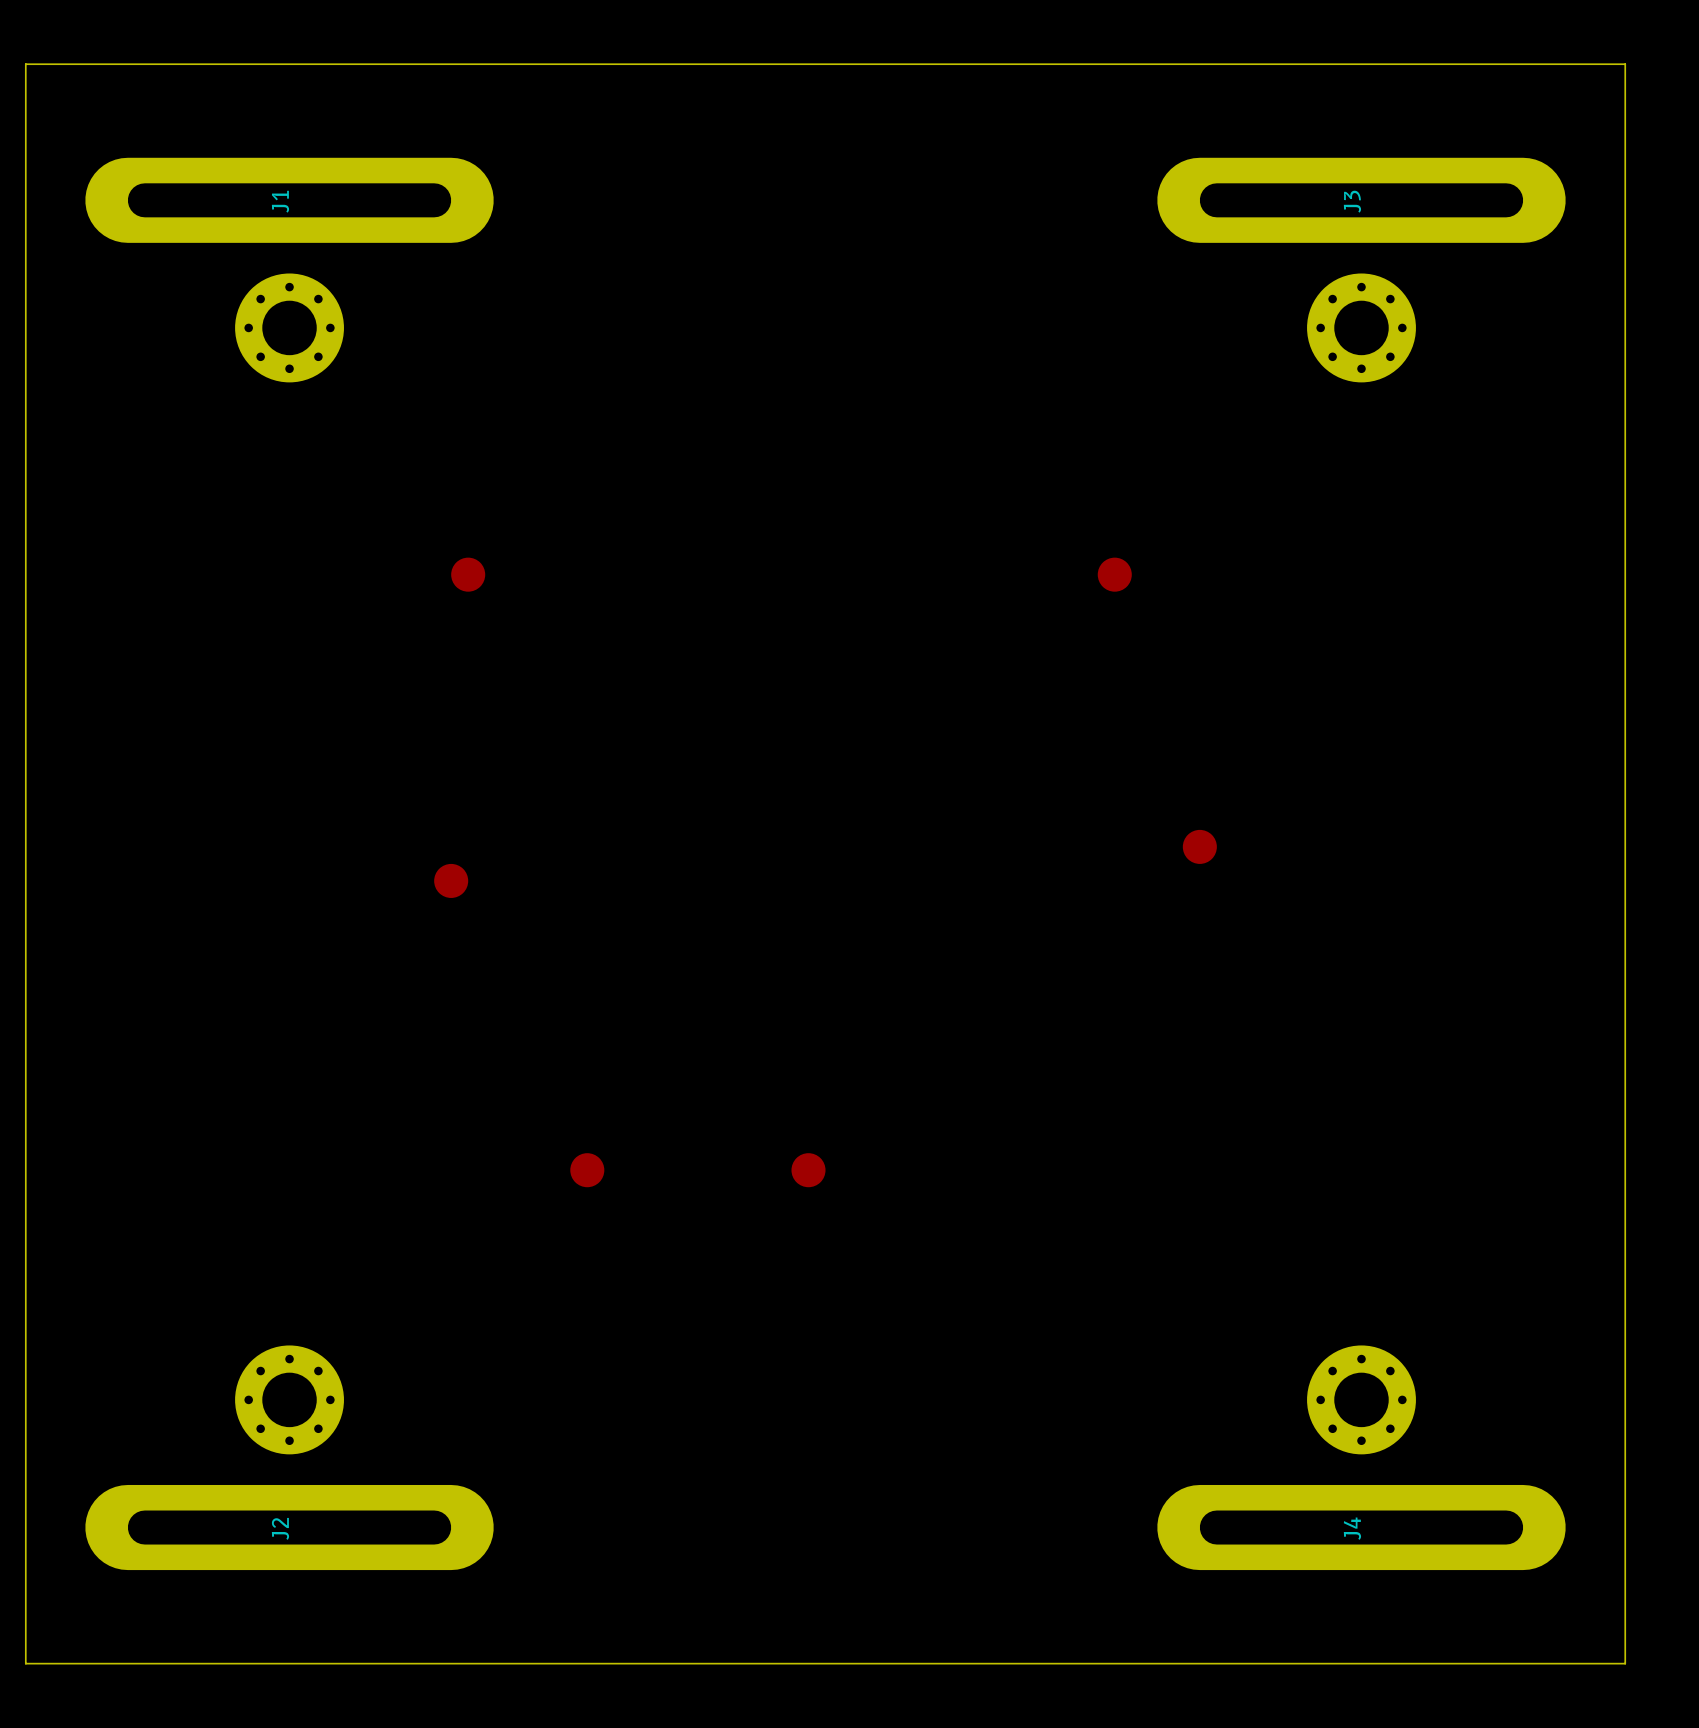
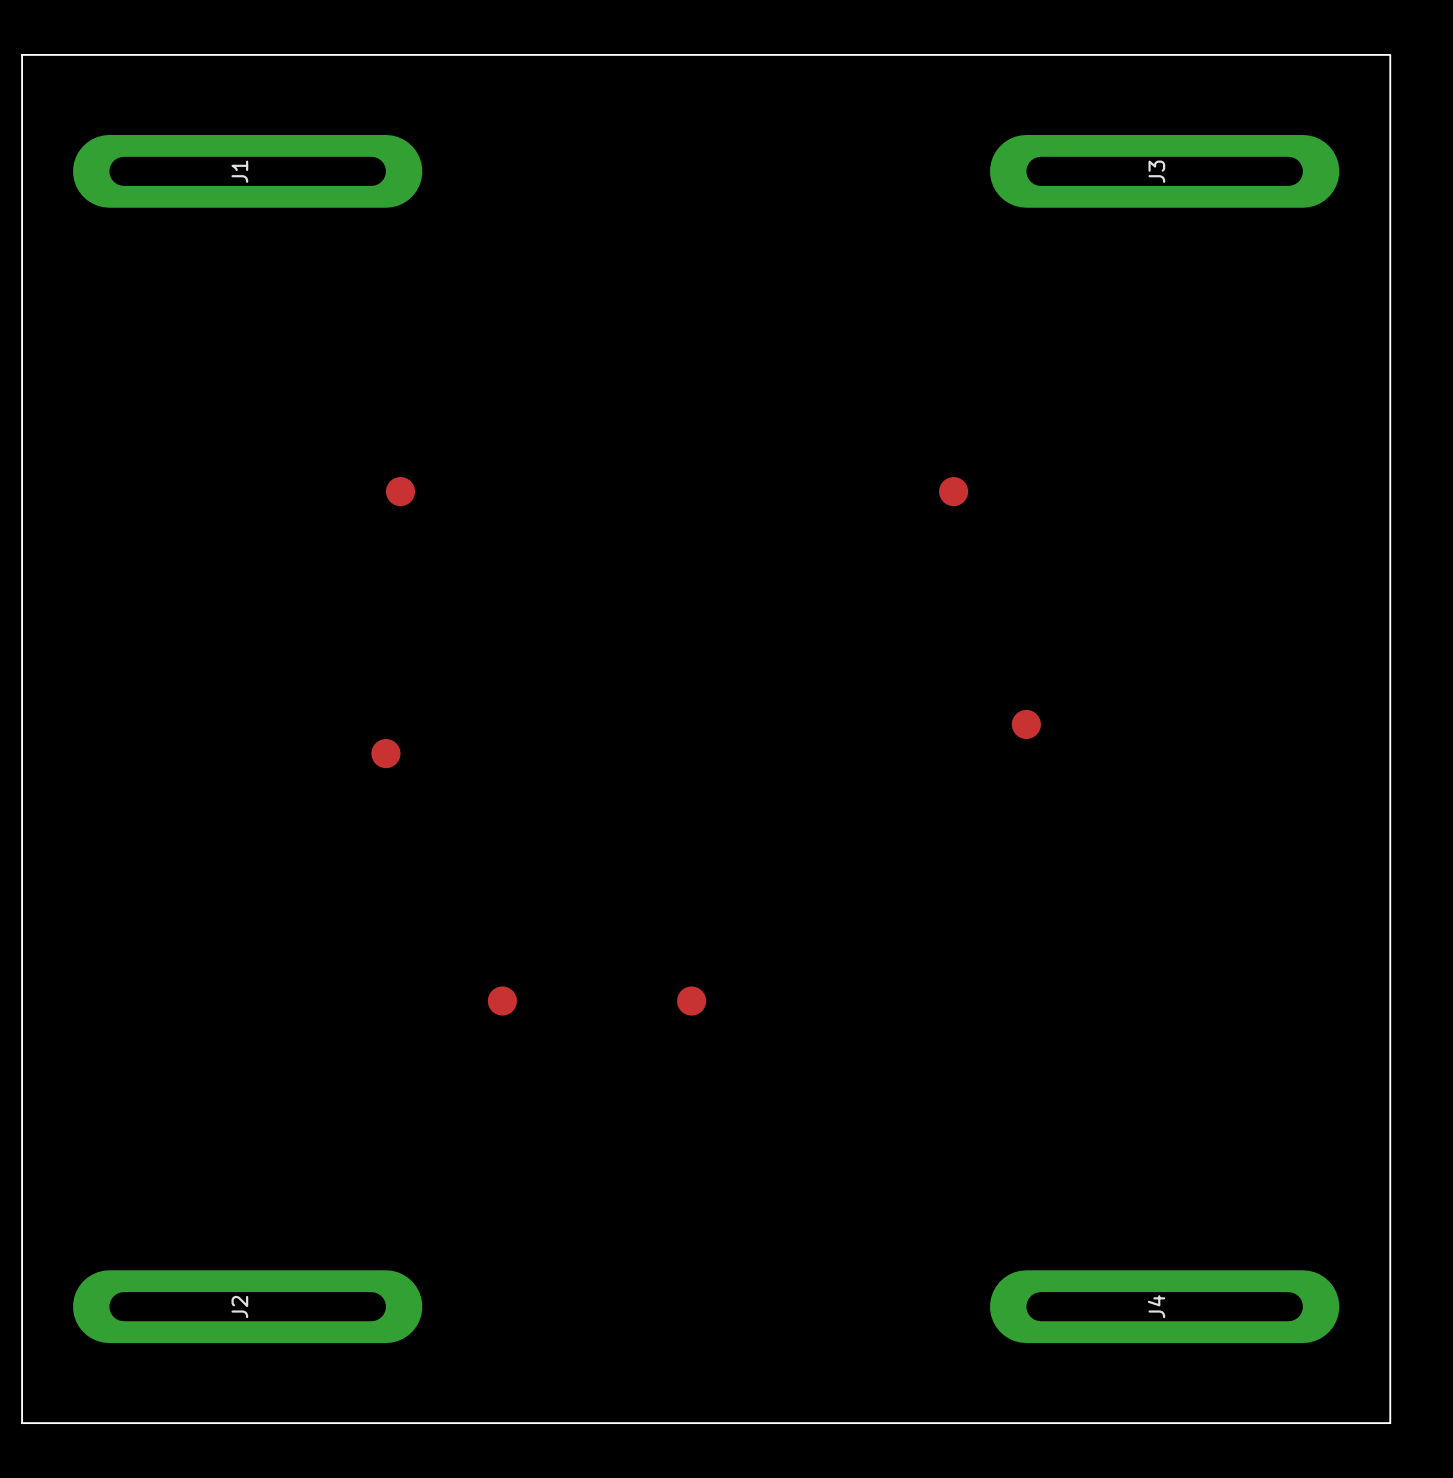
part: (289, 327) -> none
part: (1361, 327) -> none
part: (289, 1399) -> none
part: (1361, 1399) -> none

